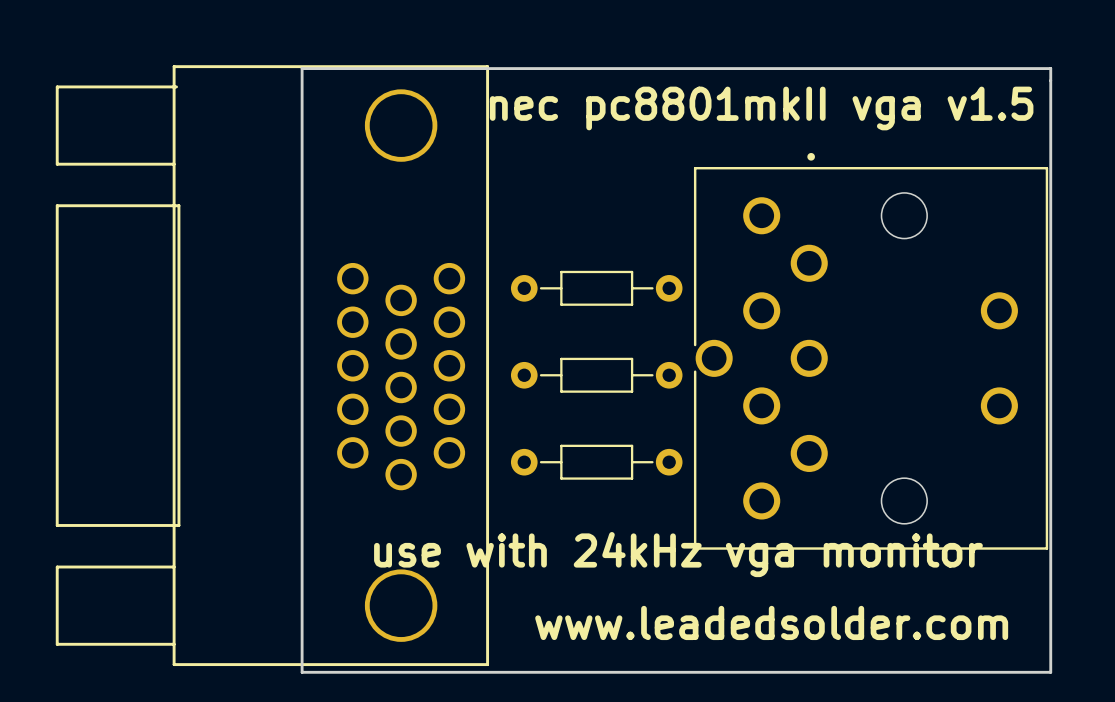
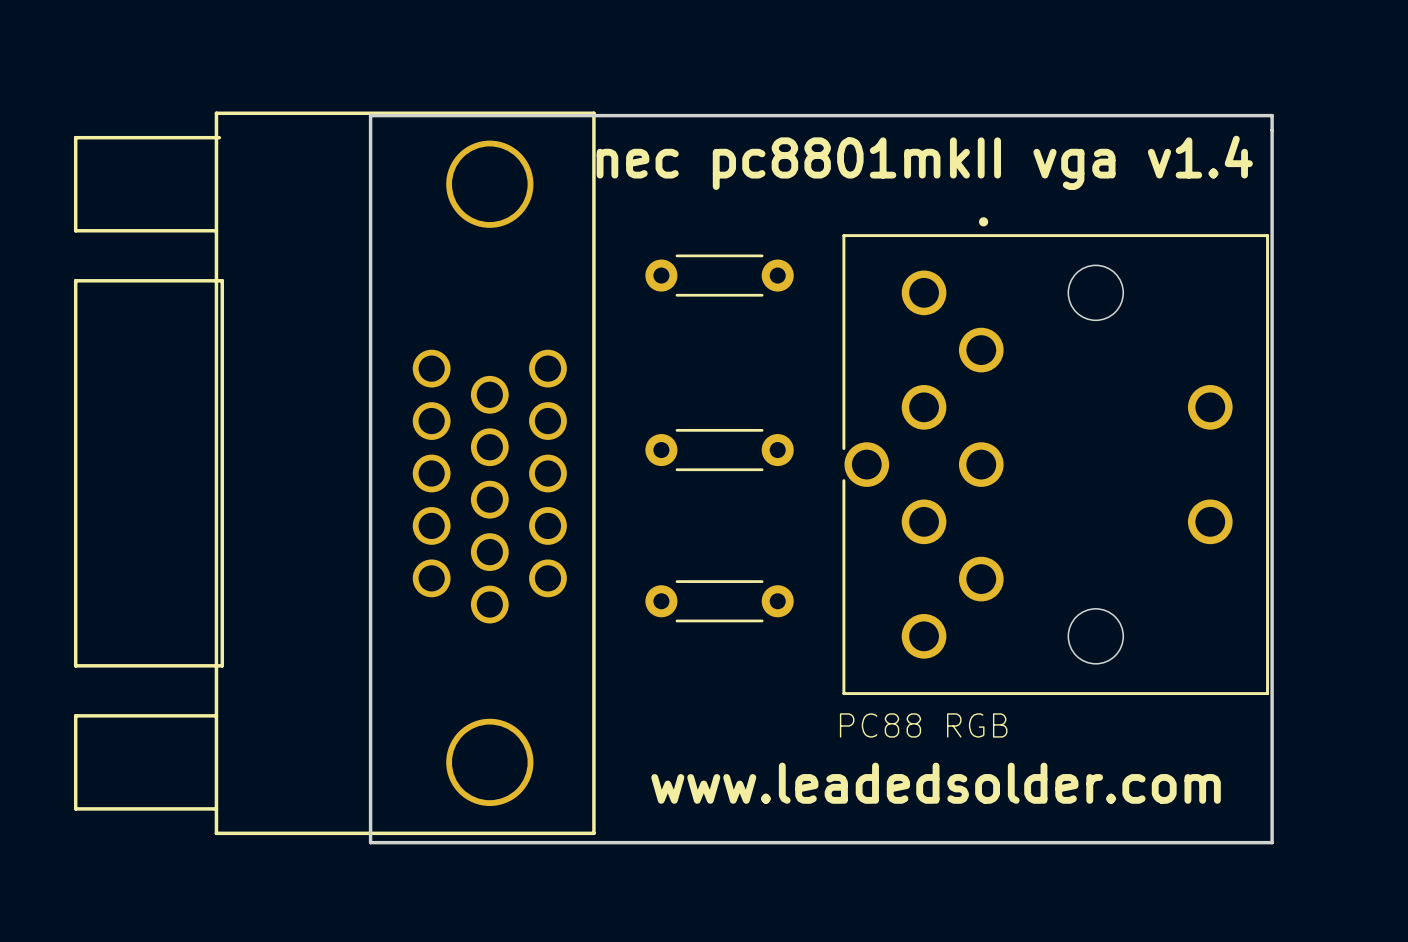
text: nec pc8801mkII vga v1.5 (761, 108) -> nec pc8801mkII vga v1.4 (924, 162)
part: none -> (719, 275)
part: (596, 288) -> none
part: none -> (719, 450)
part: (596, 375) -> none
part footprint: [510, 444, 683, 480] -> [645, 580, 794, 623]
text: use with 24kHz vga monitor (678, 554) -> none
part value: none -> PC88 RGB (923, 725)

